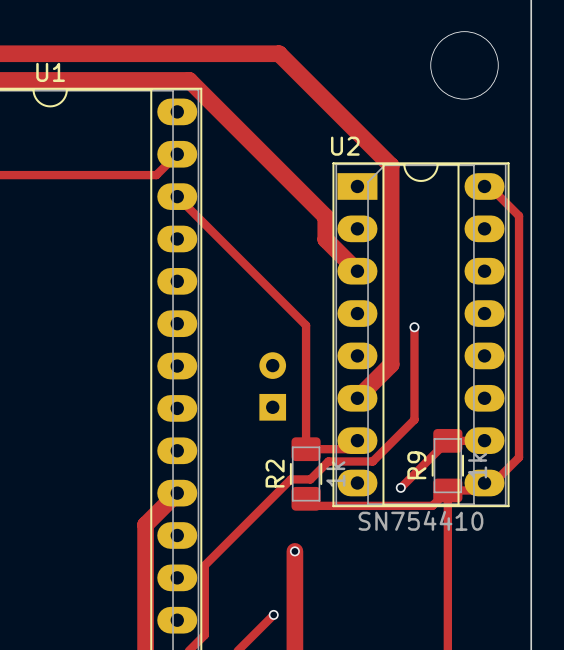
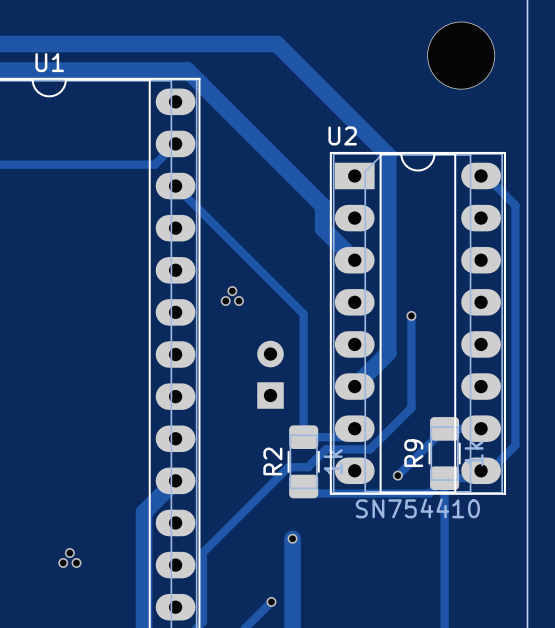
via: none -> (232, 291)
via: none -> (225, 301)
via: none -> (238, 301)
via: none -> (69, 553)
via: none -> (63, 562)
via: none -> (76, 562)

